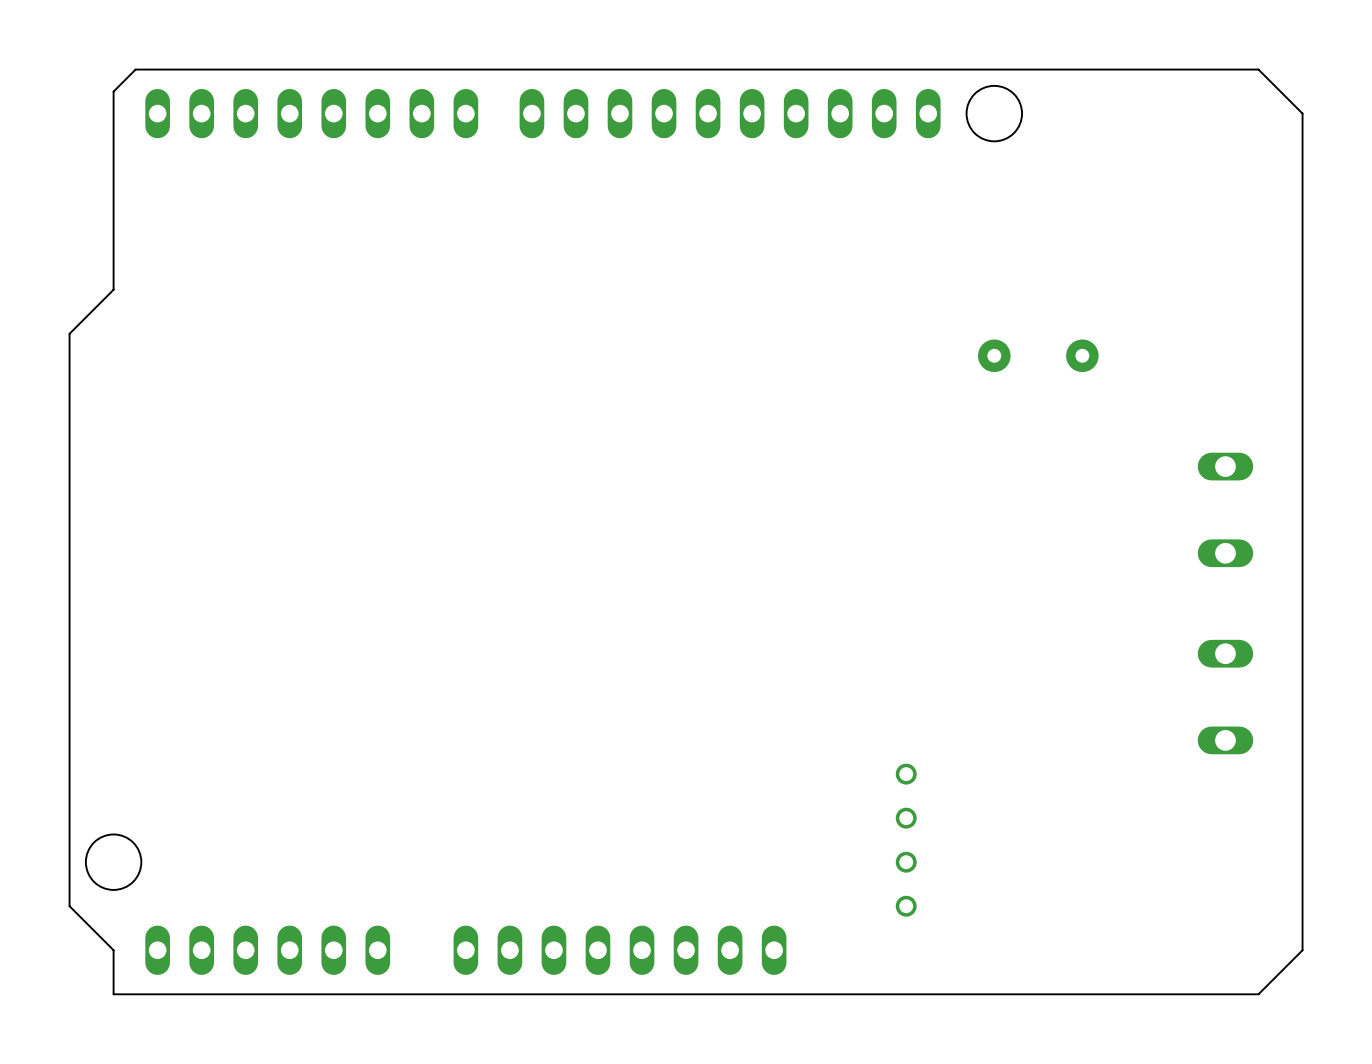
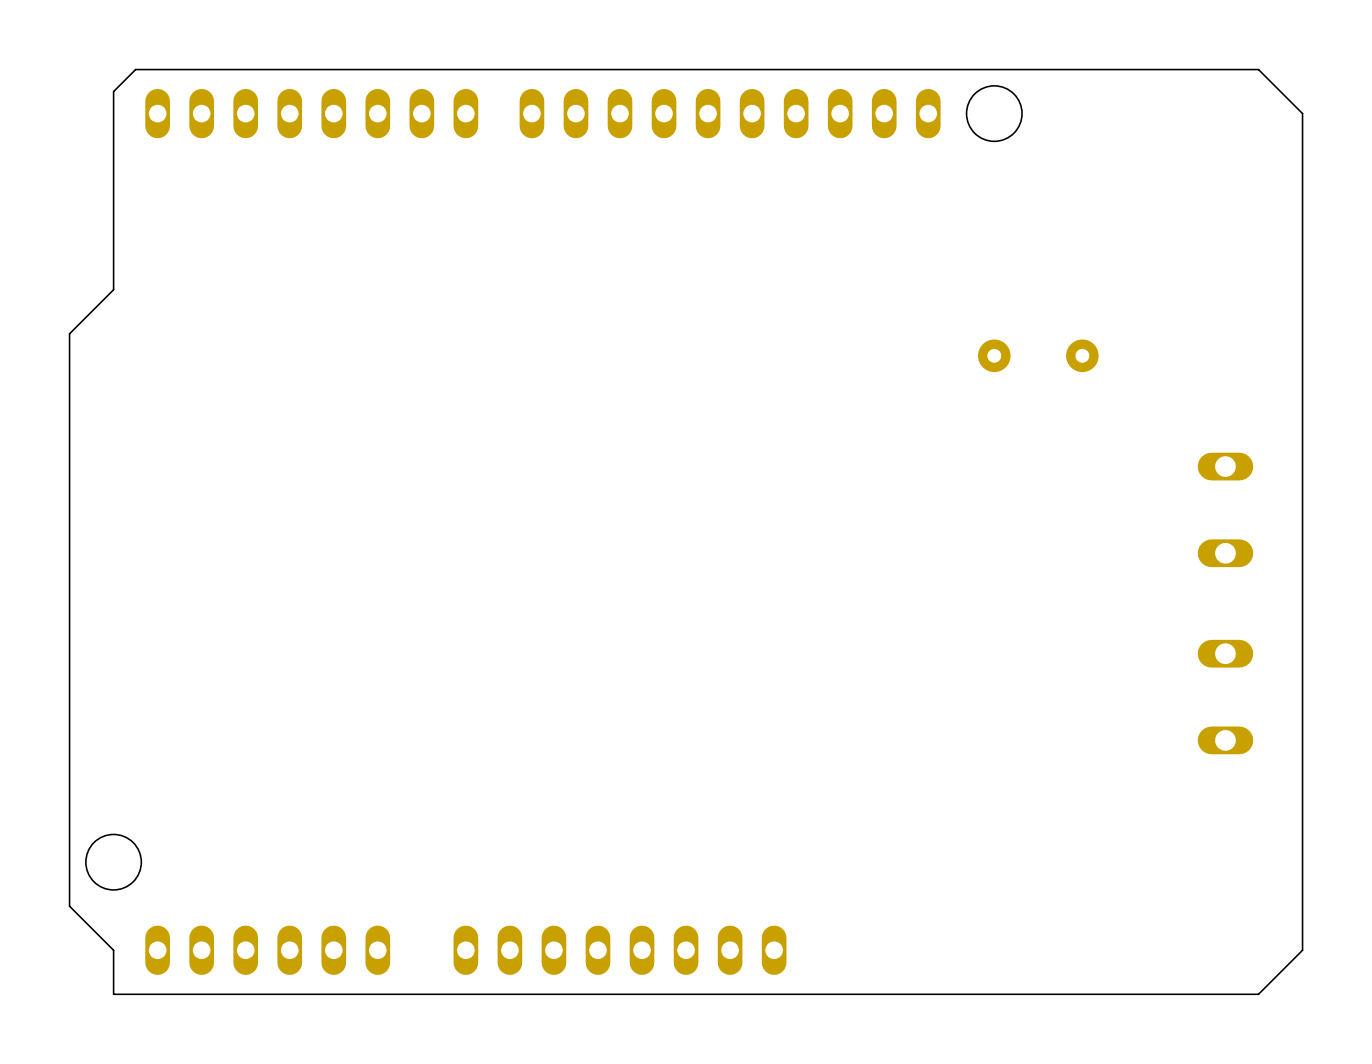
part: (906, 840) -> none

